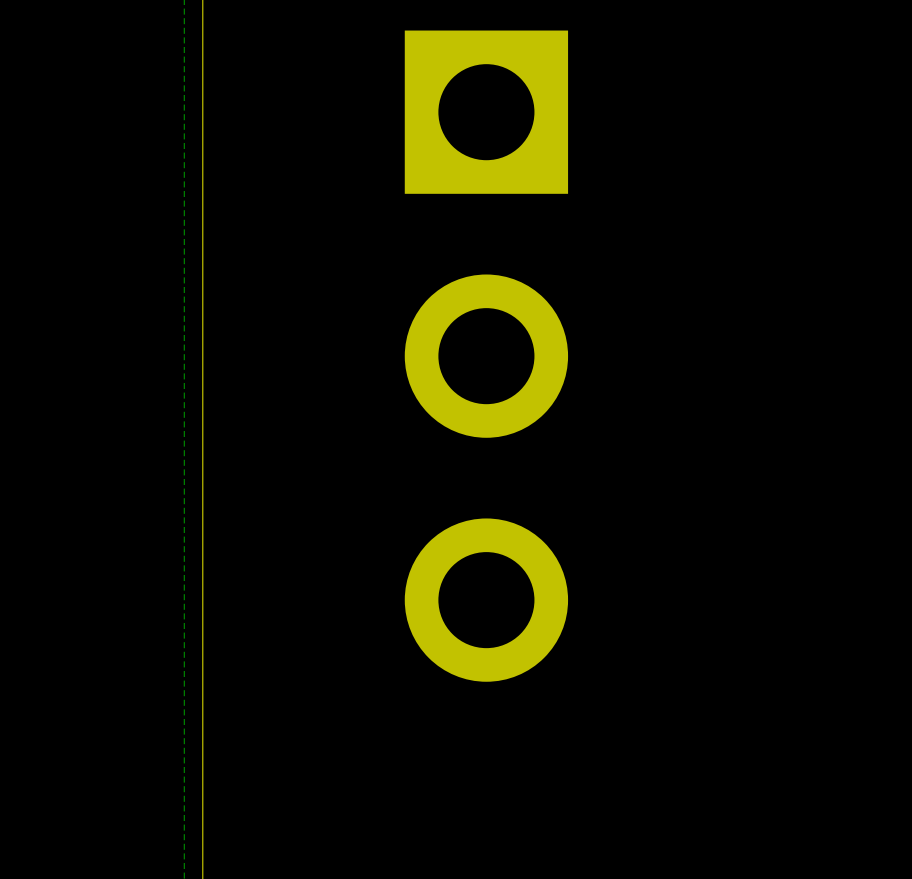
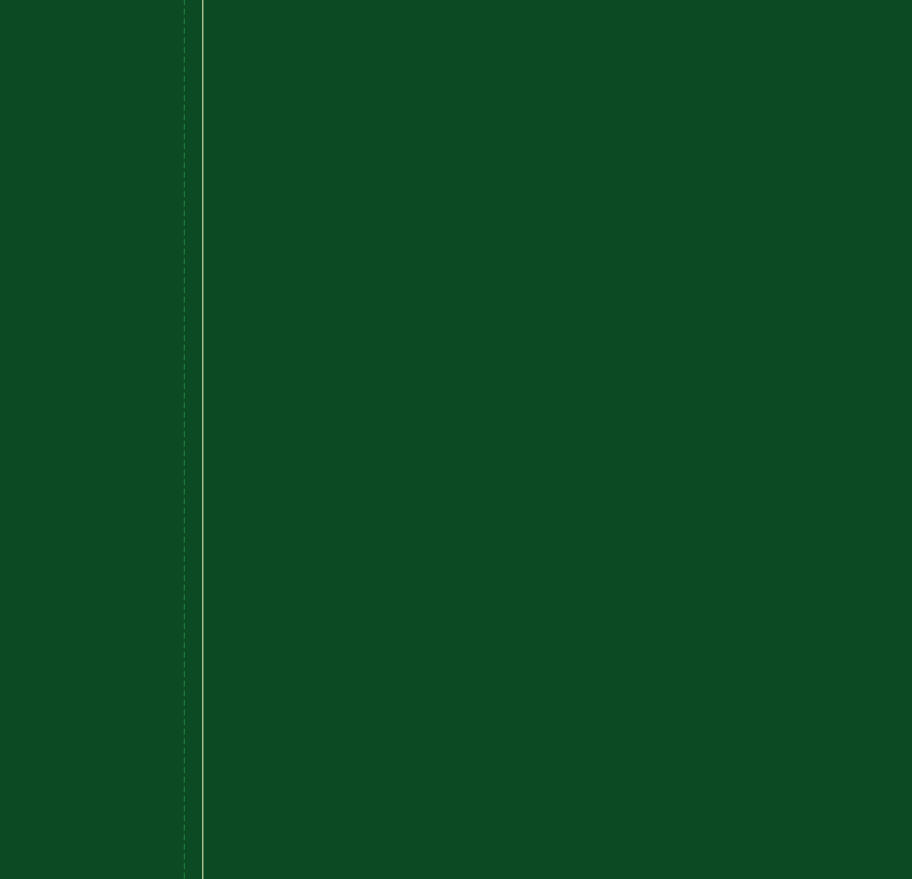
part: (486, 356) -> none

